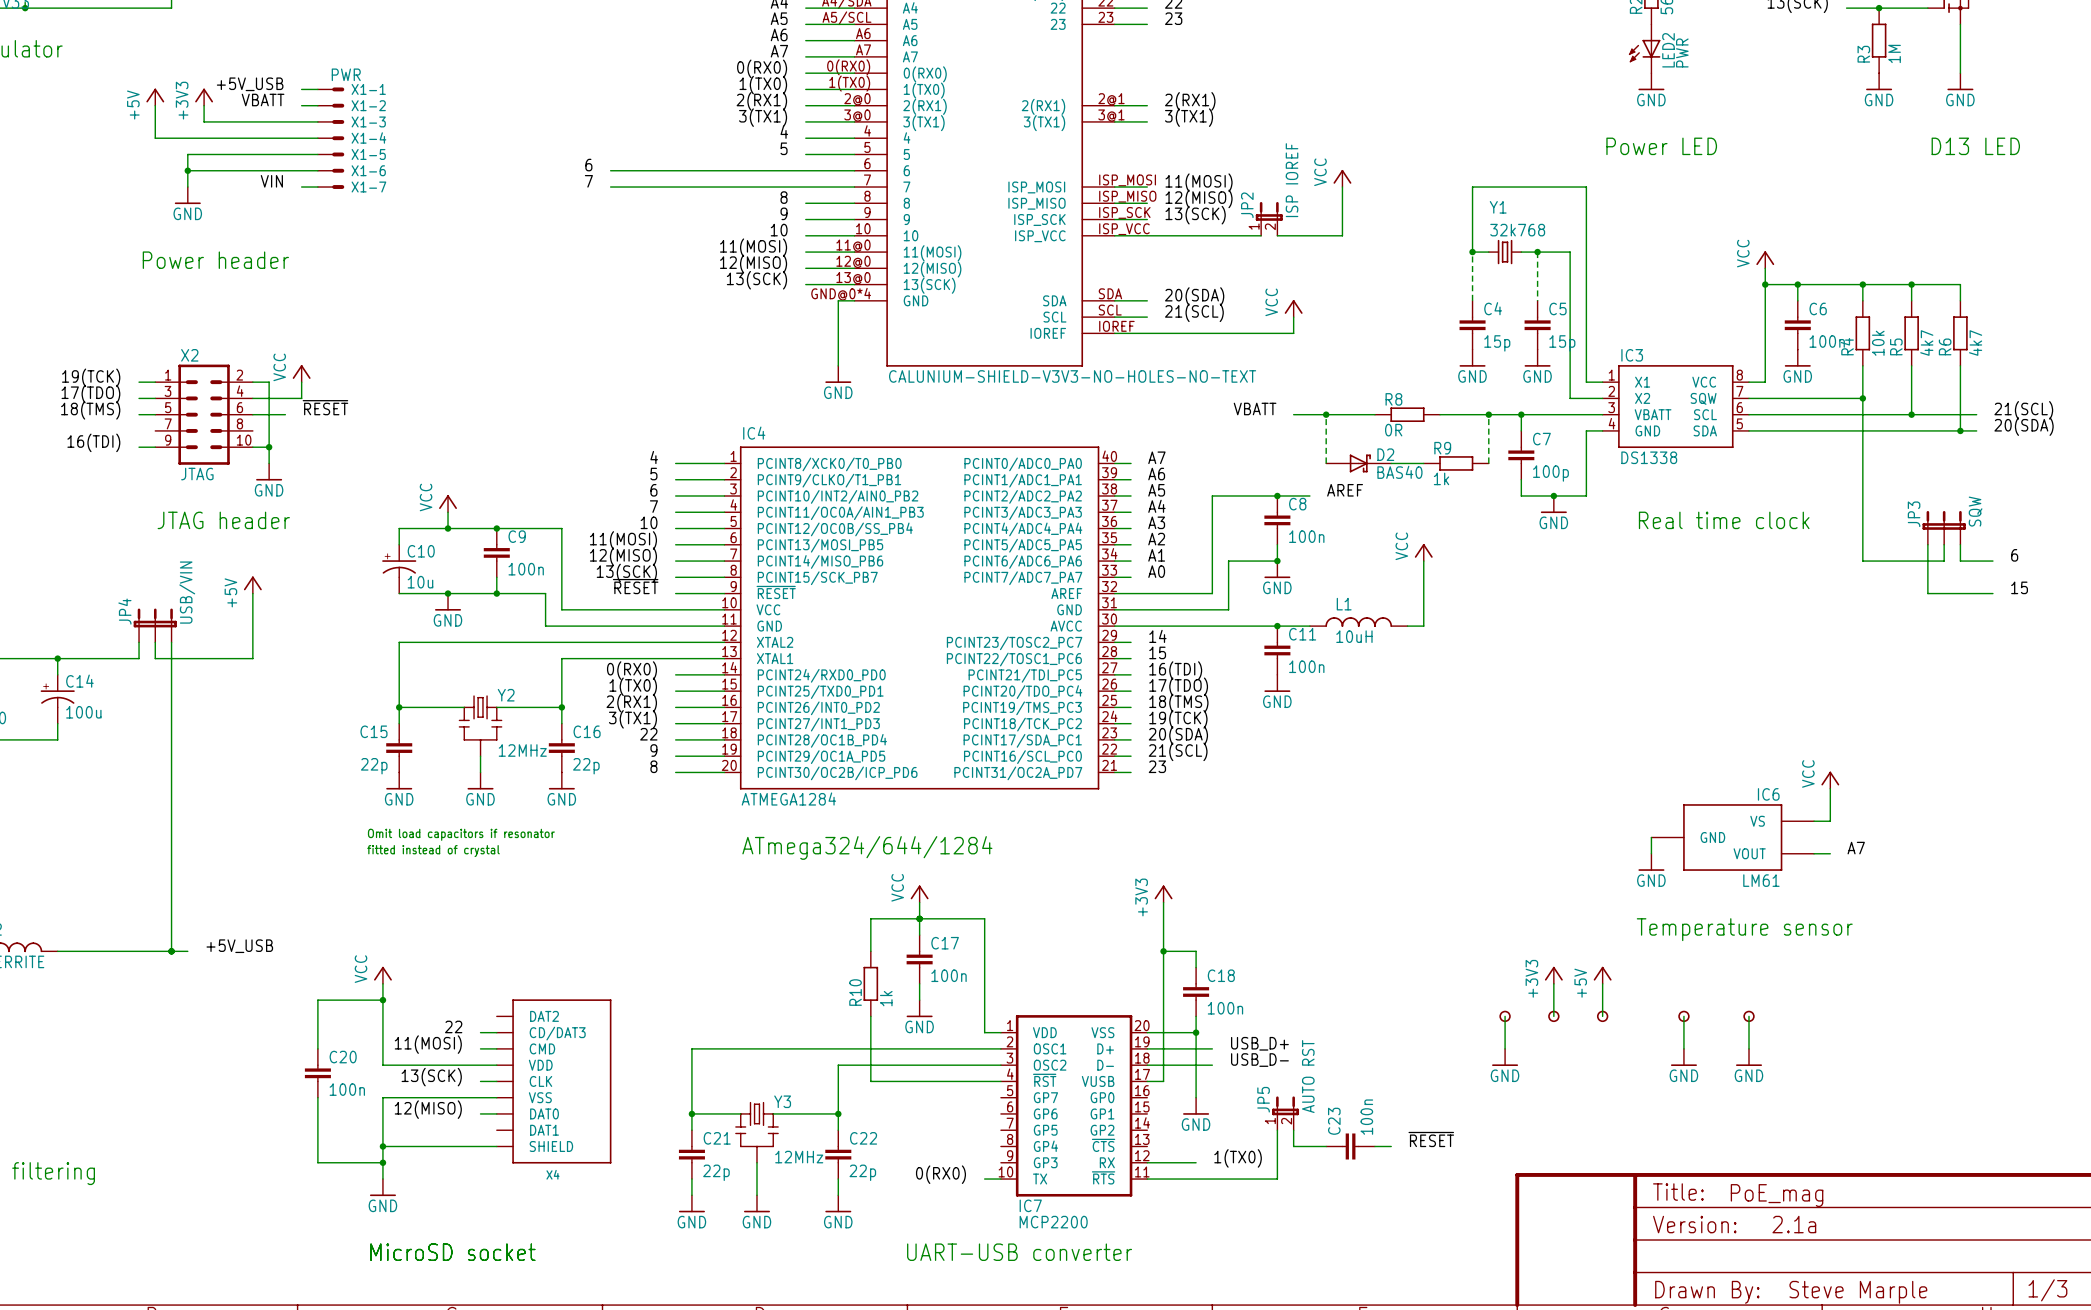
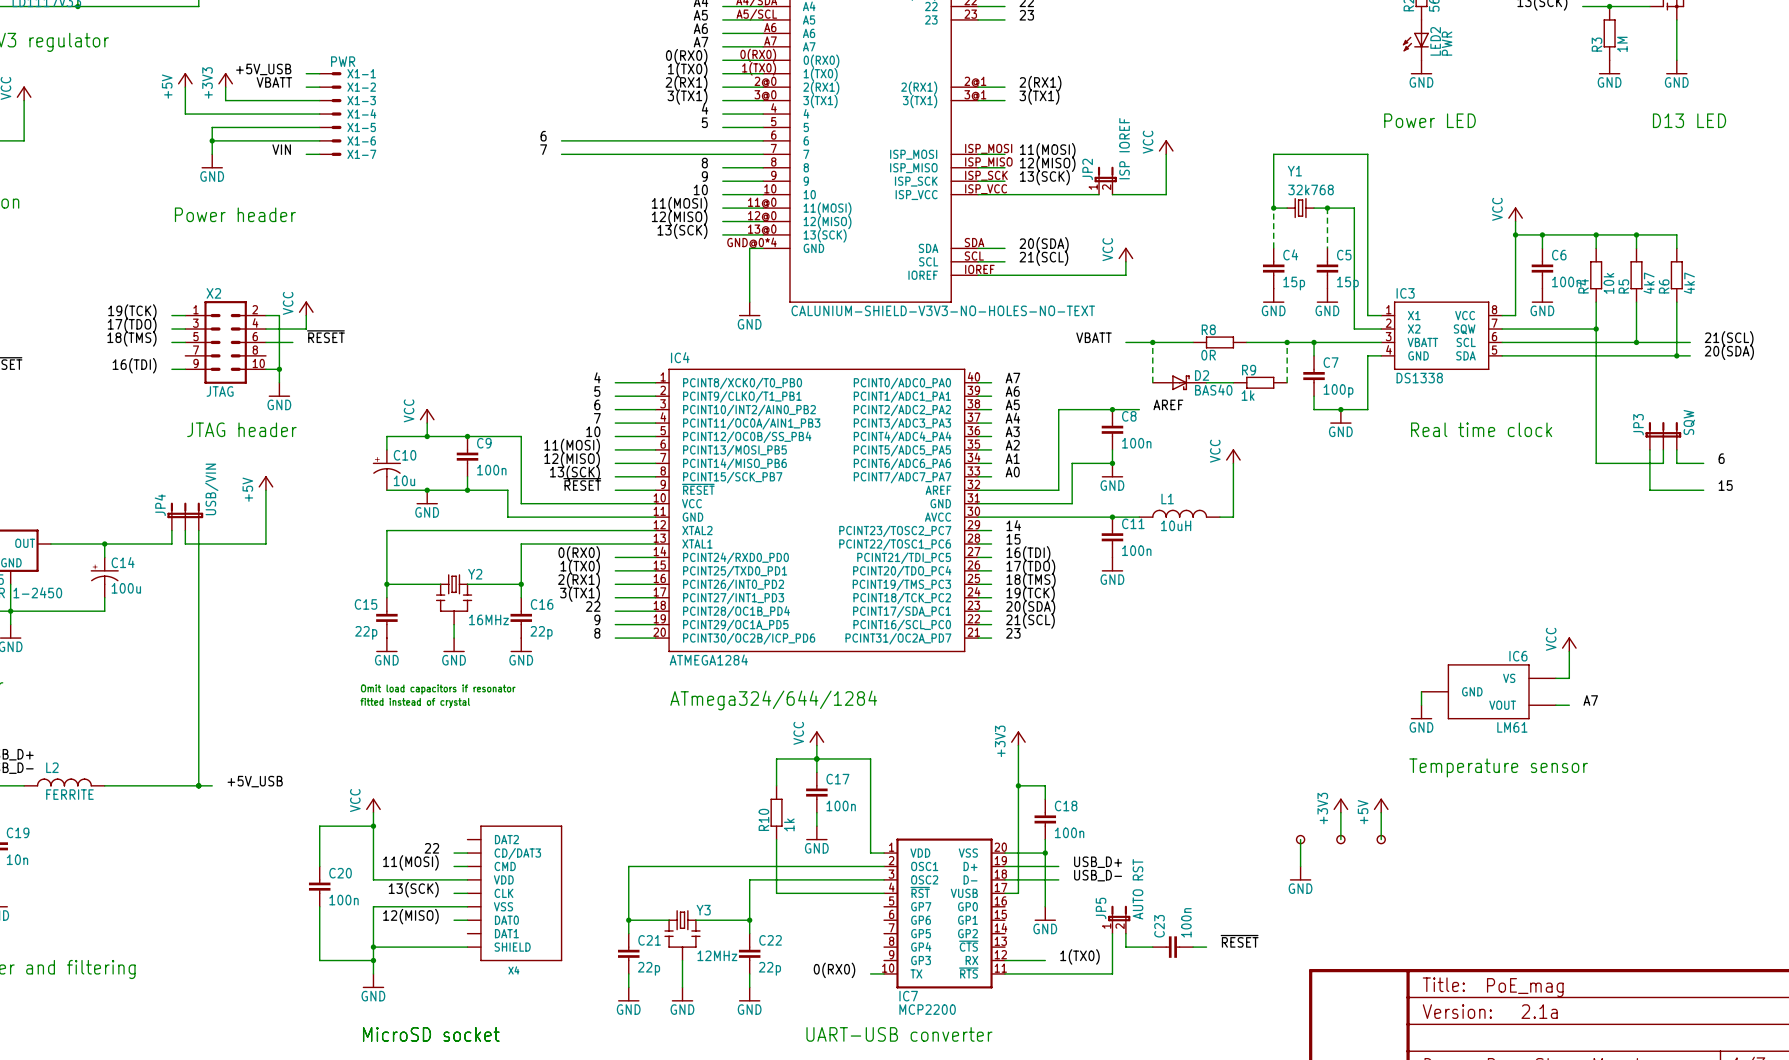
Y2 value: 12MHz (522, 750) -> 16MHz (488, 619)
wire: (1683, 1016) (1683, 1048) -> none
part: (1683, 1016) -> none
wire: (1749, 1016) (1749, 1048) -> none
part: (1749, 1016) -> none
power symbol: GND (1683, 1057) -> none
power symbol: GND (1749, 1057) -> none

